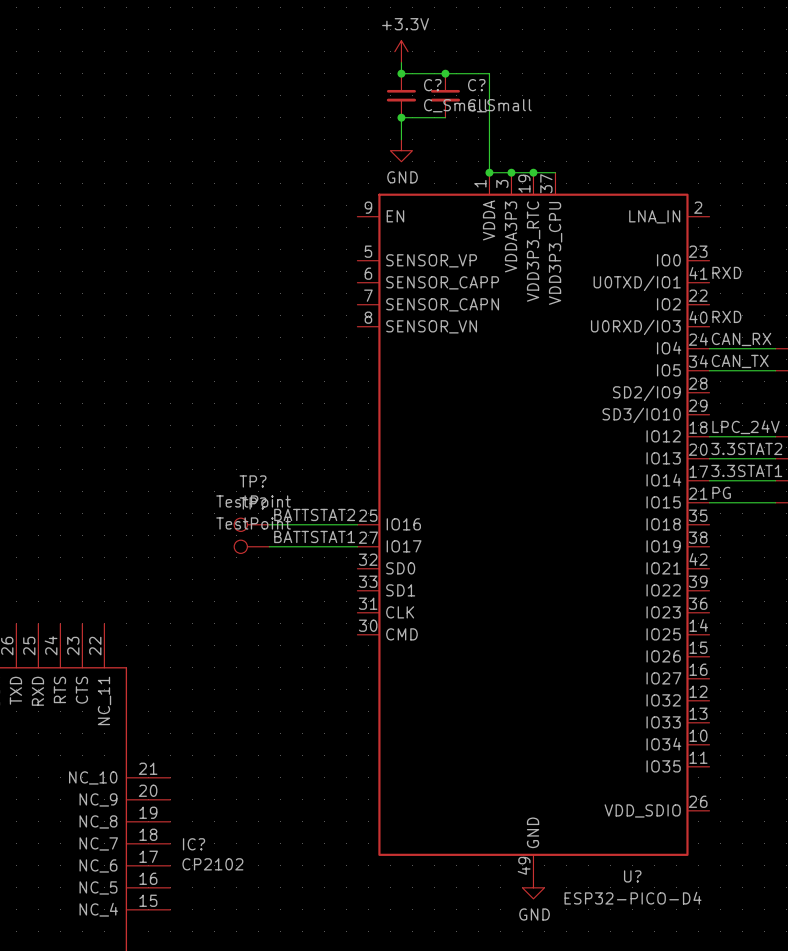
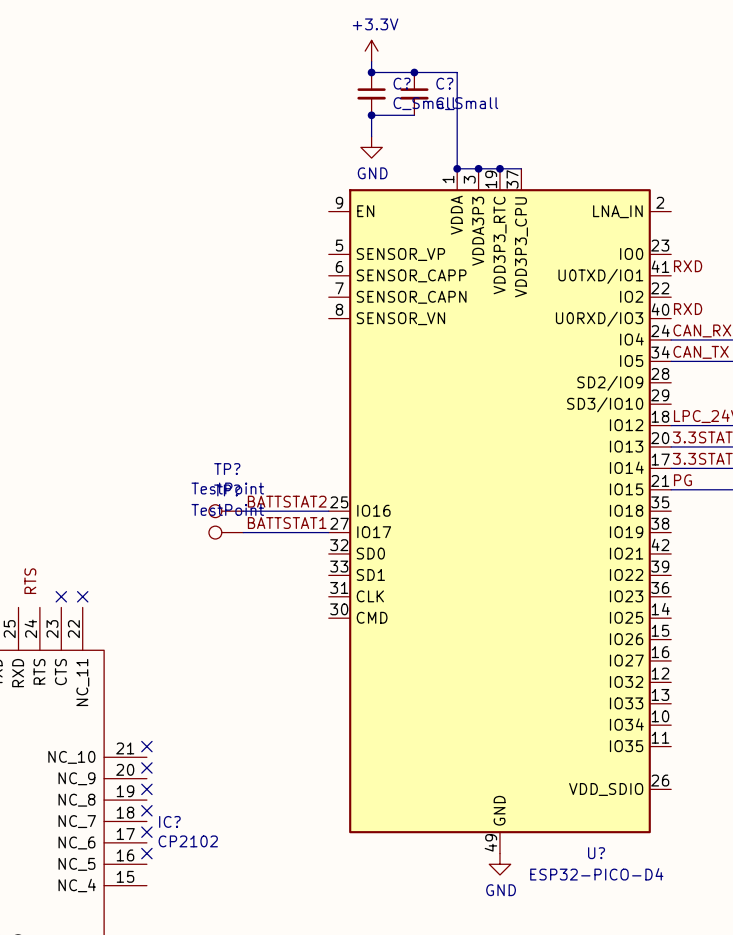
label: none -> RTS (30, 581)
no-connect mark: none -> (61, 596)
no-connect mark: none -> (82, 596)
no-connect mark: none -> (146, 746)
no-connect mark: none -> (146, 767)
no-connect mark: none -> (146, 789)
no-connect mark: none -> (146, 810)
no-connect mark: none -> (146, 832)
no-connect mark: none -> (146, 853)

